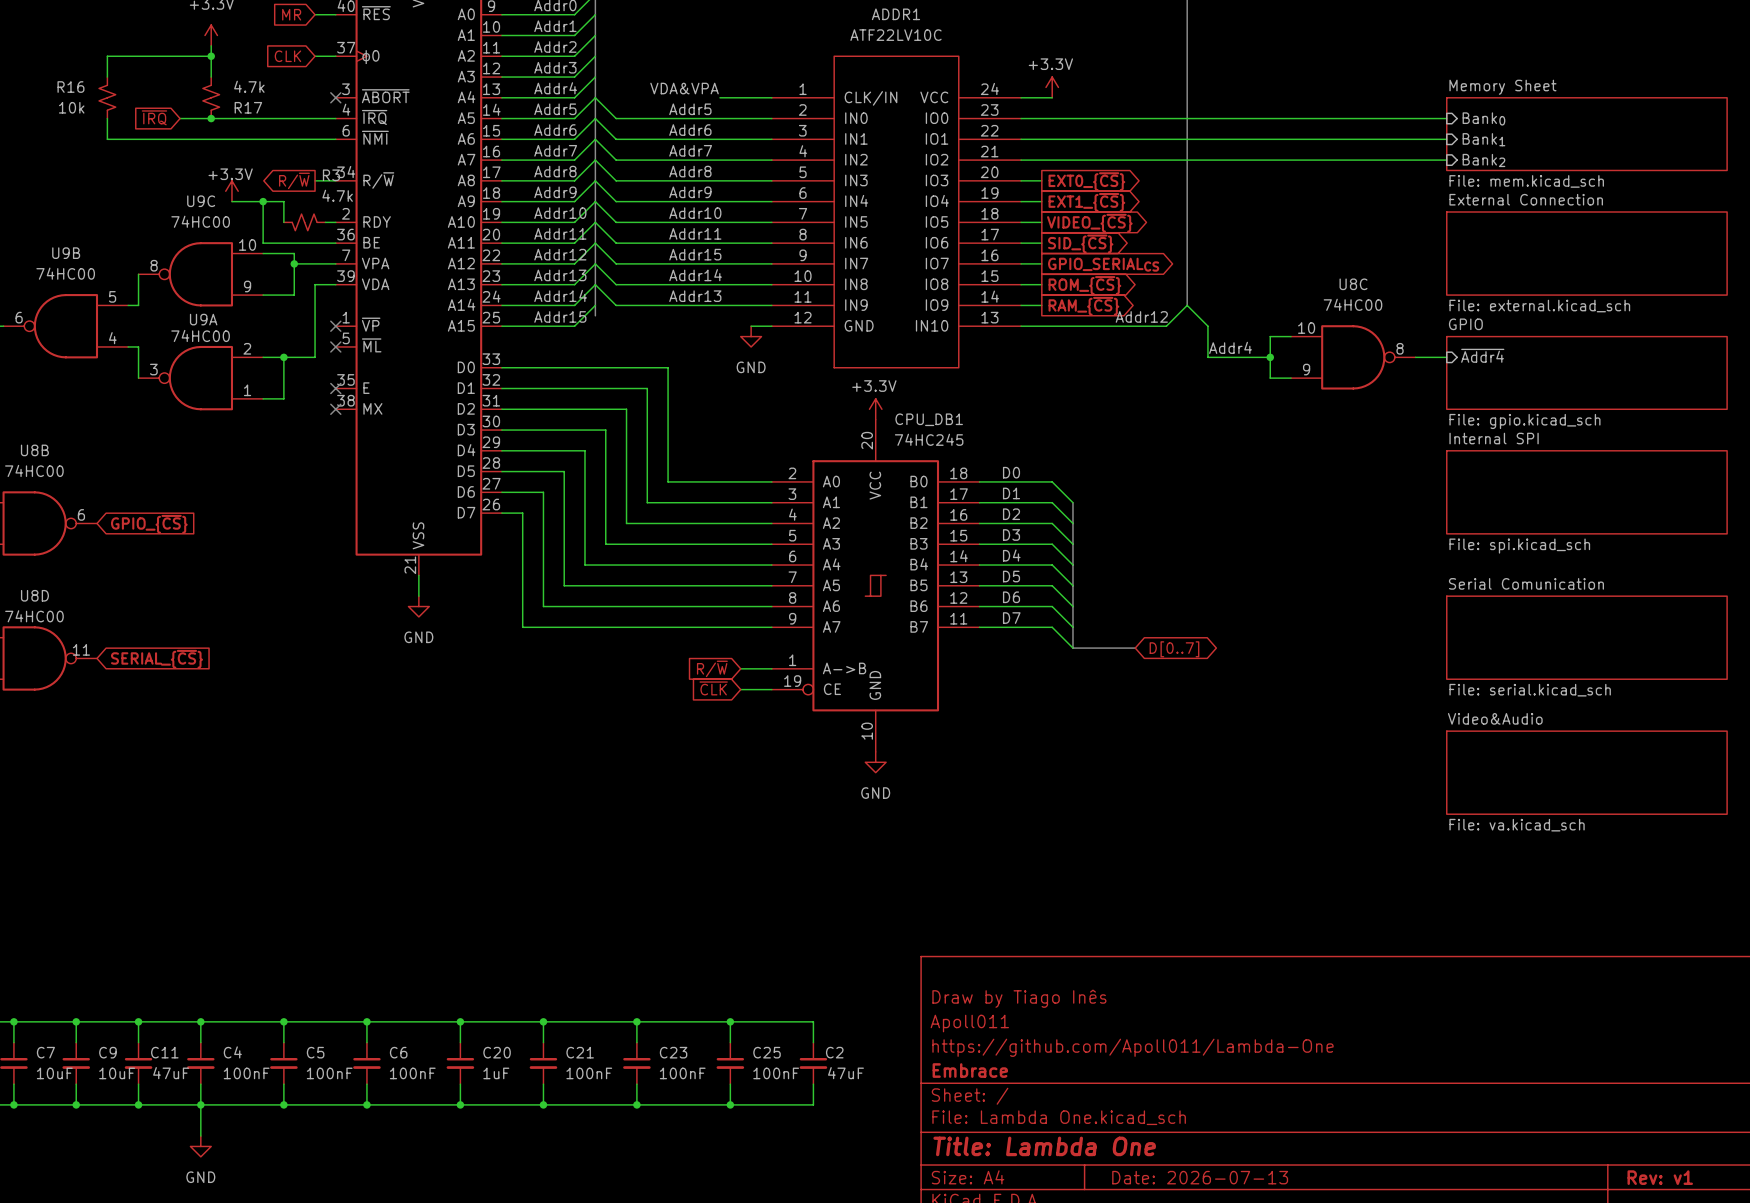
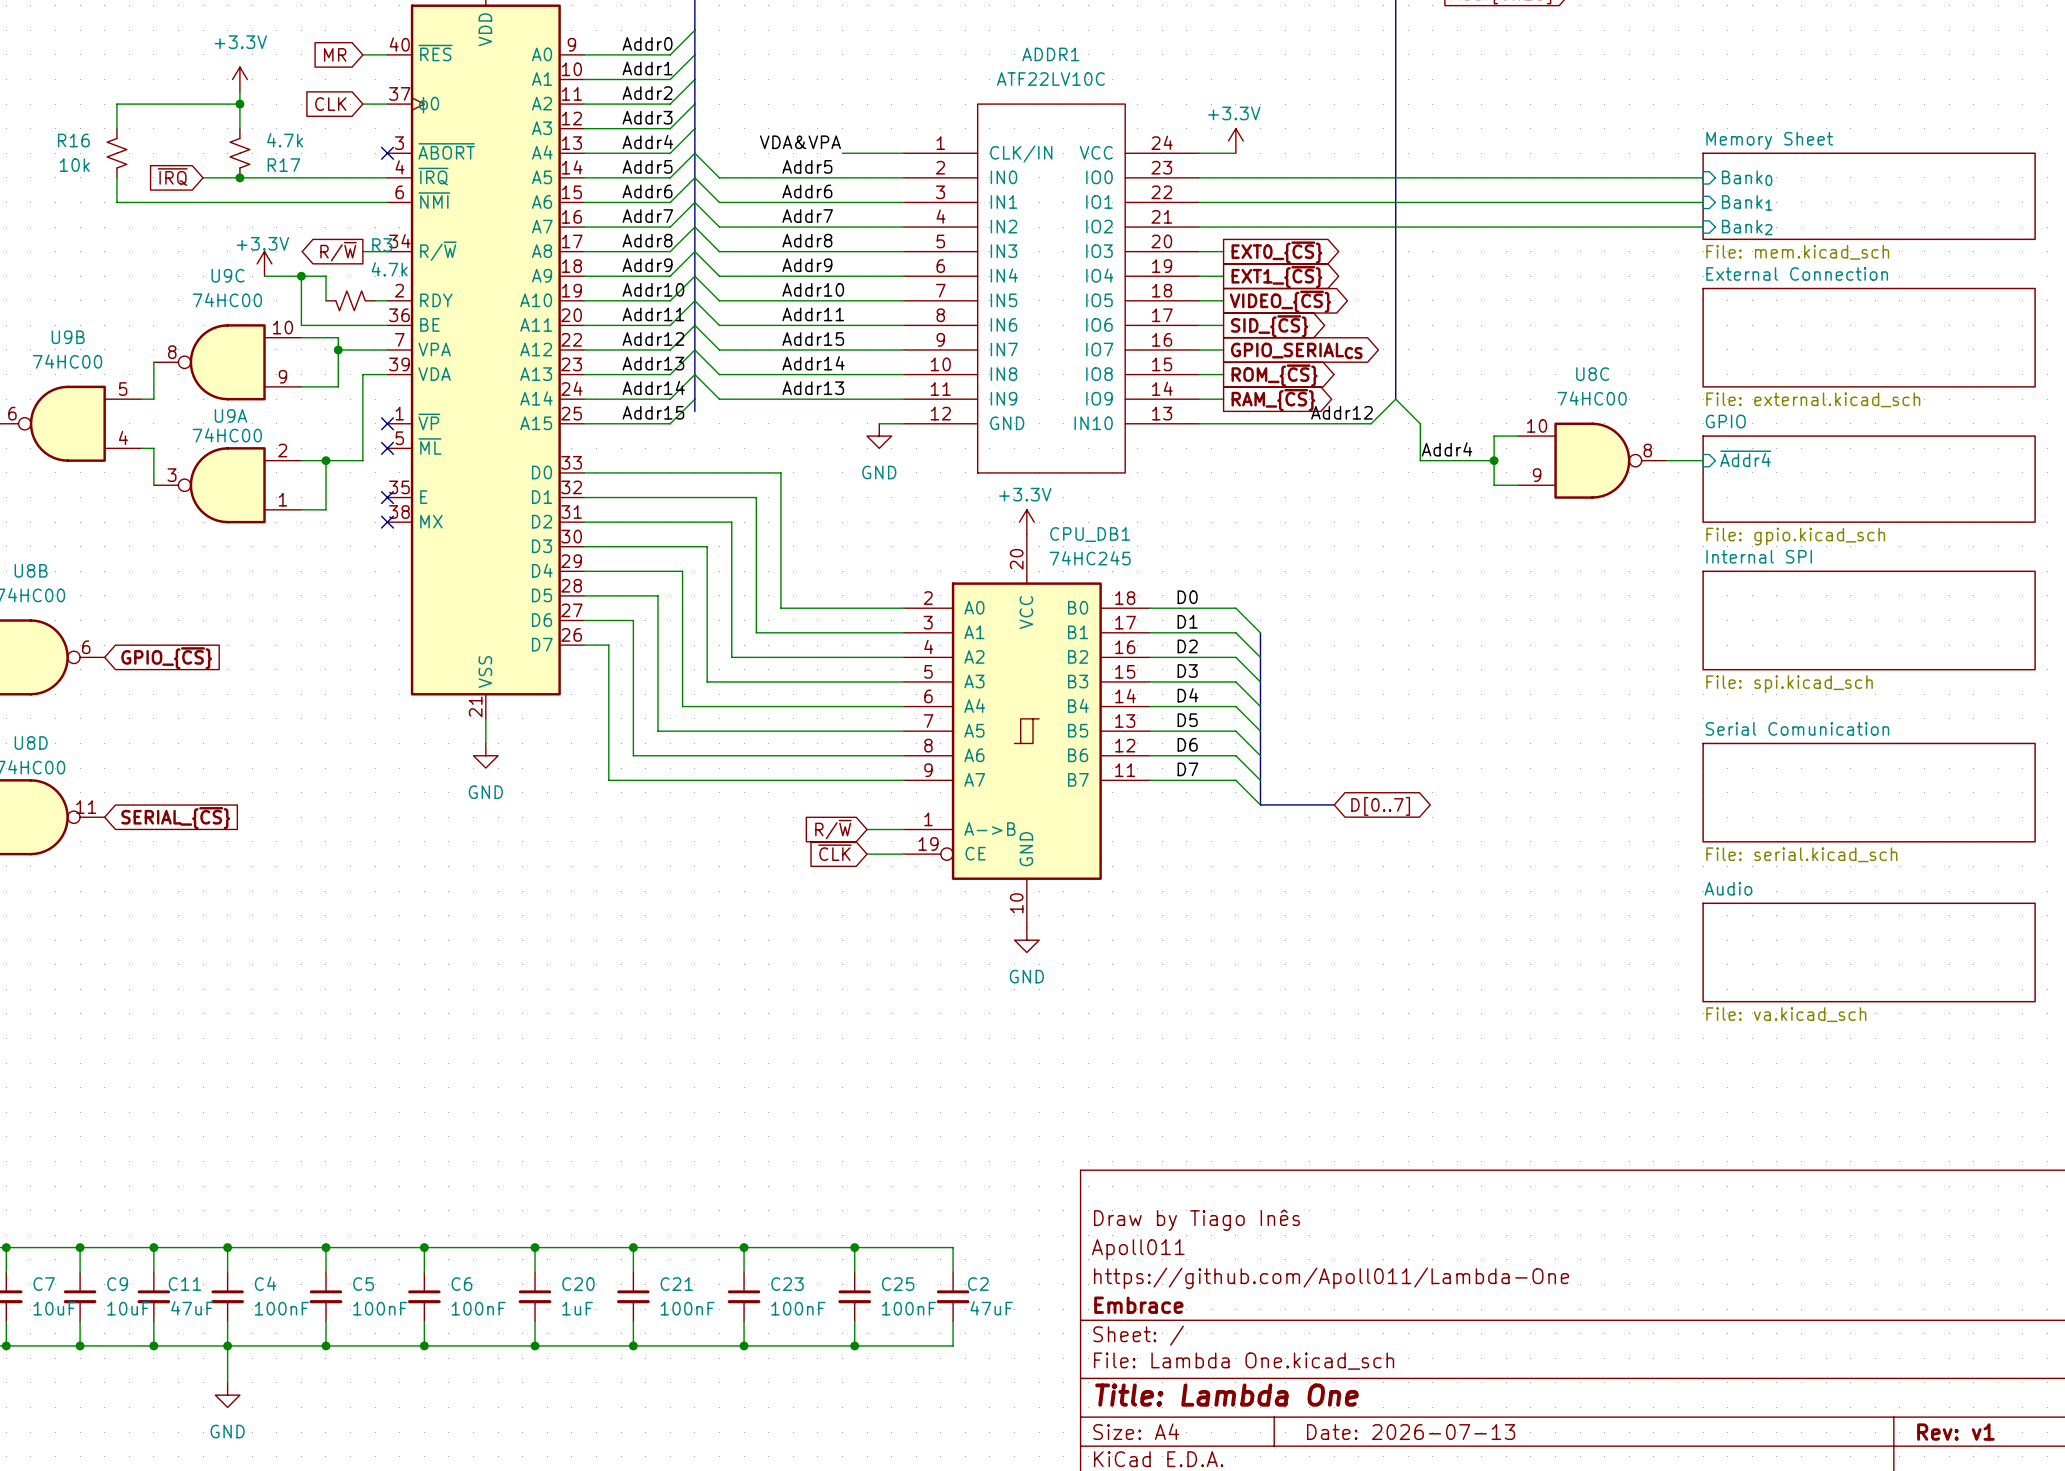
sheet Video&Audio name: Video&Audio (1495, 718) -> Audio (1728, 888)

